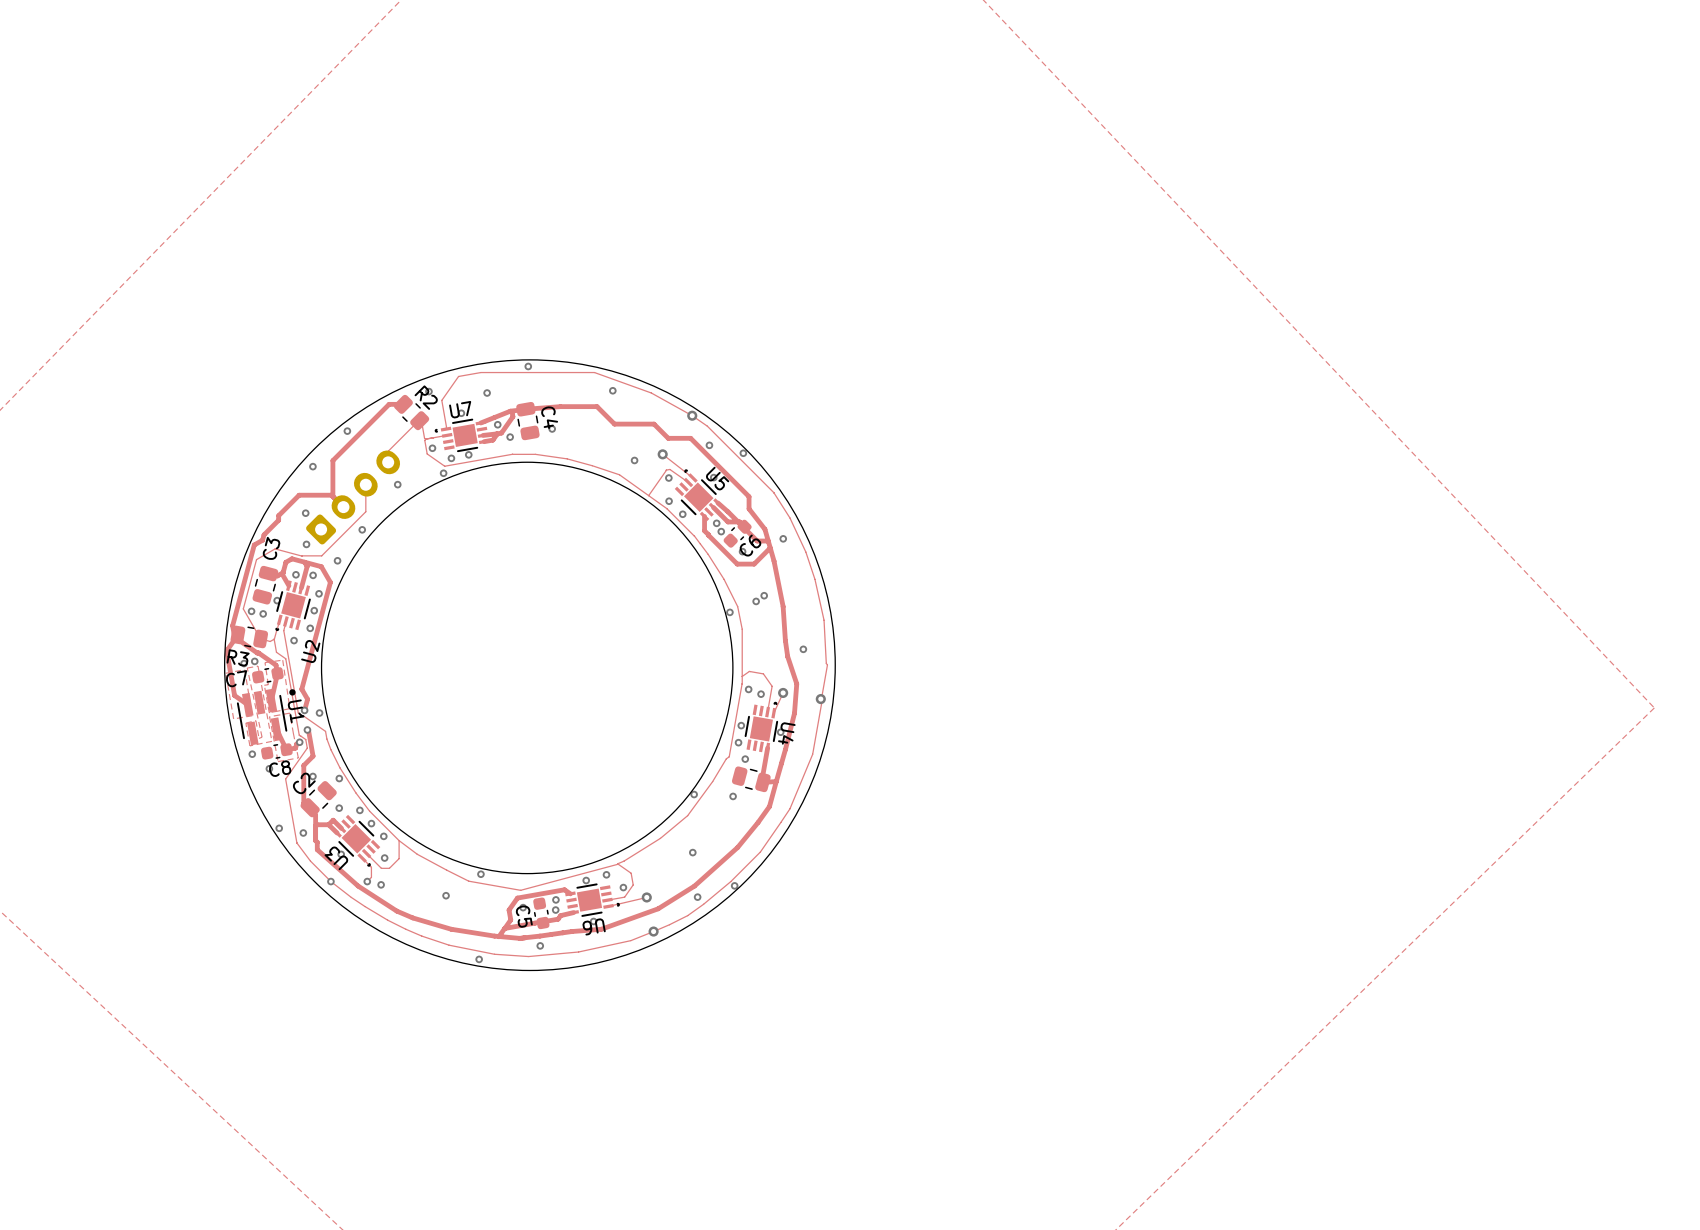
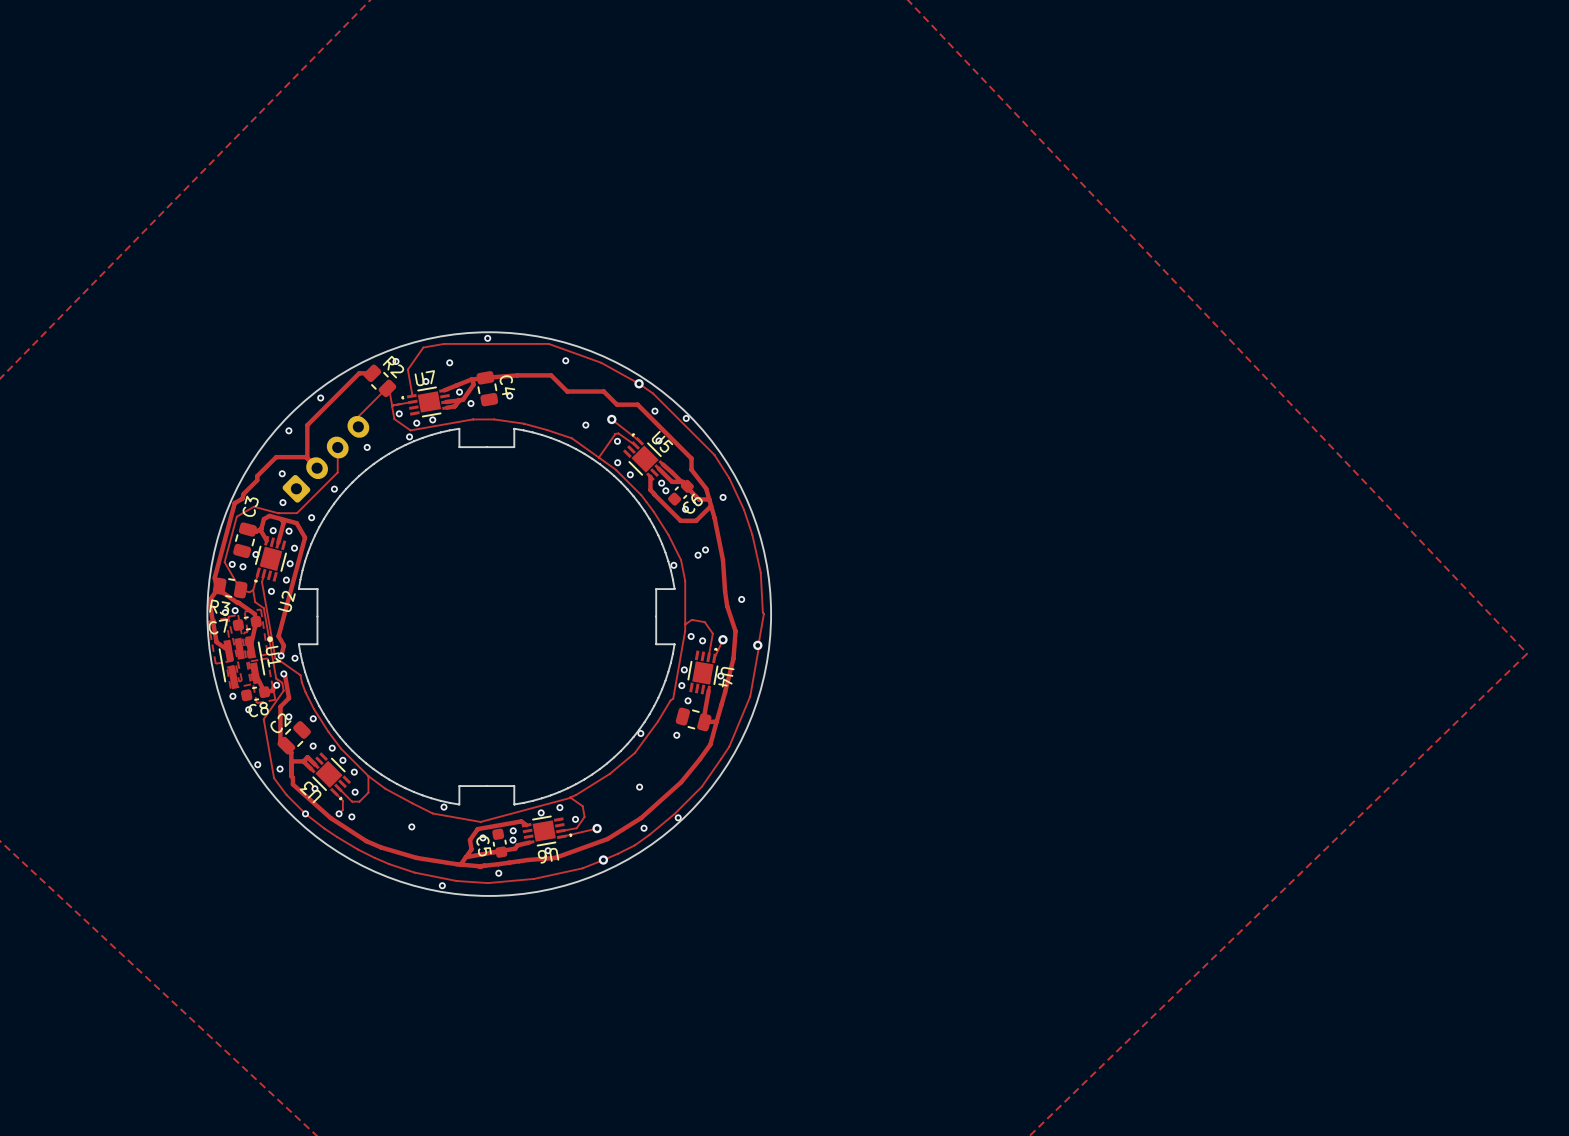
round board edge: [320, 461, 734, 875] -> none
board edge: none -> (299, 589) (317, 589)
board edge: none -> (299, 589) (307, 552) (323, 519) (346, 489) (373, 464) (414, 441) (458, 428) (459, 447) (514, 447) (514, 428) (550, 437) (584, 453) (614, 475) (639, 503) (662, 543) (674, 588) (656, 589) (656, 644) (674, 644)
board edge: none -> (317, 589) (317, 616)
board edge: none -> (317, 616) (317, 644) (298, 644) (311, 689) (334, 729) (359, 757) (389, 779) (422, 795) (458, 804) (459, 786) (514, 786) (514, 804) (559, 792) (599, 769) (627, 744) (649, 714) (665, 680) (674, 644)

